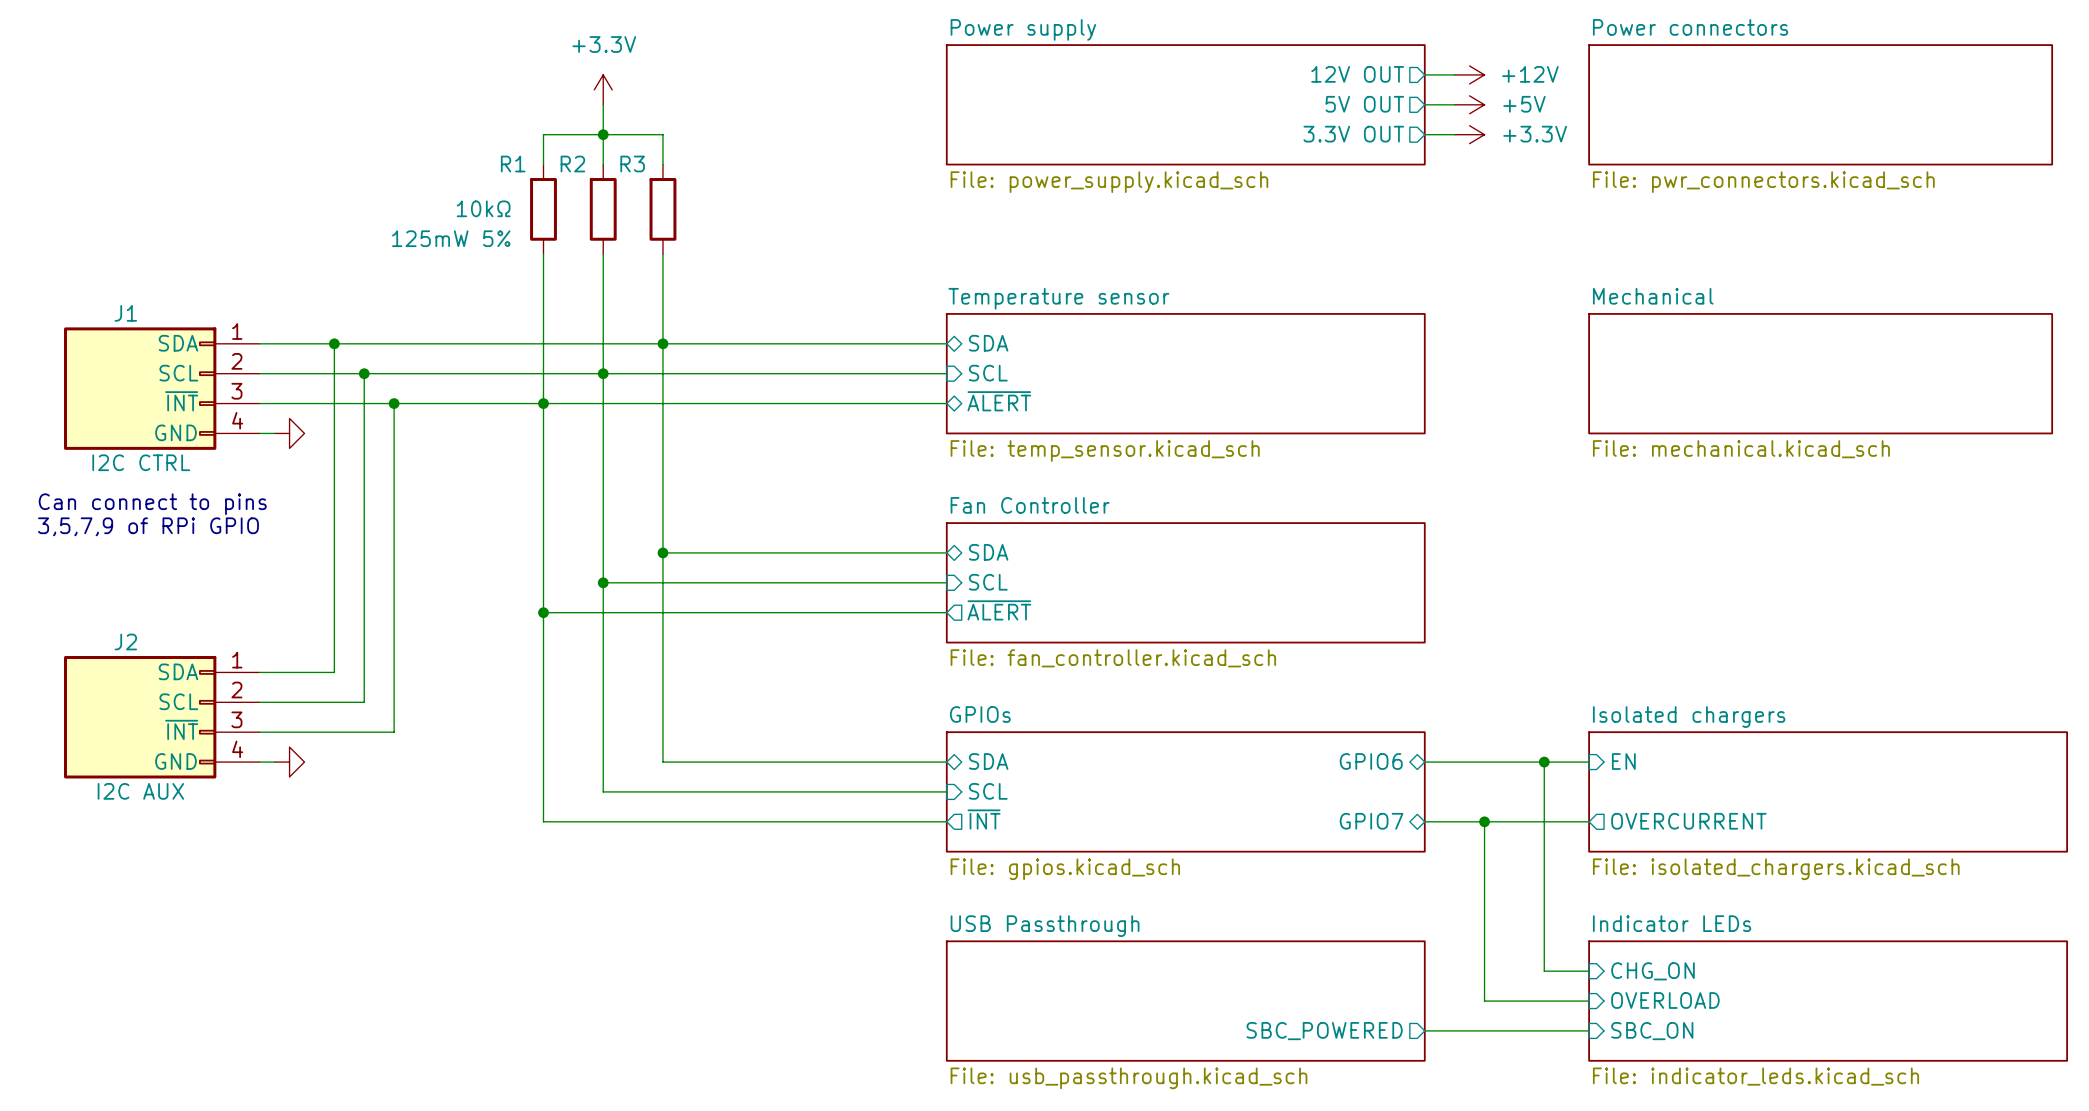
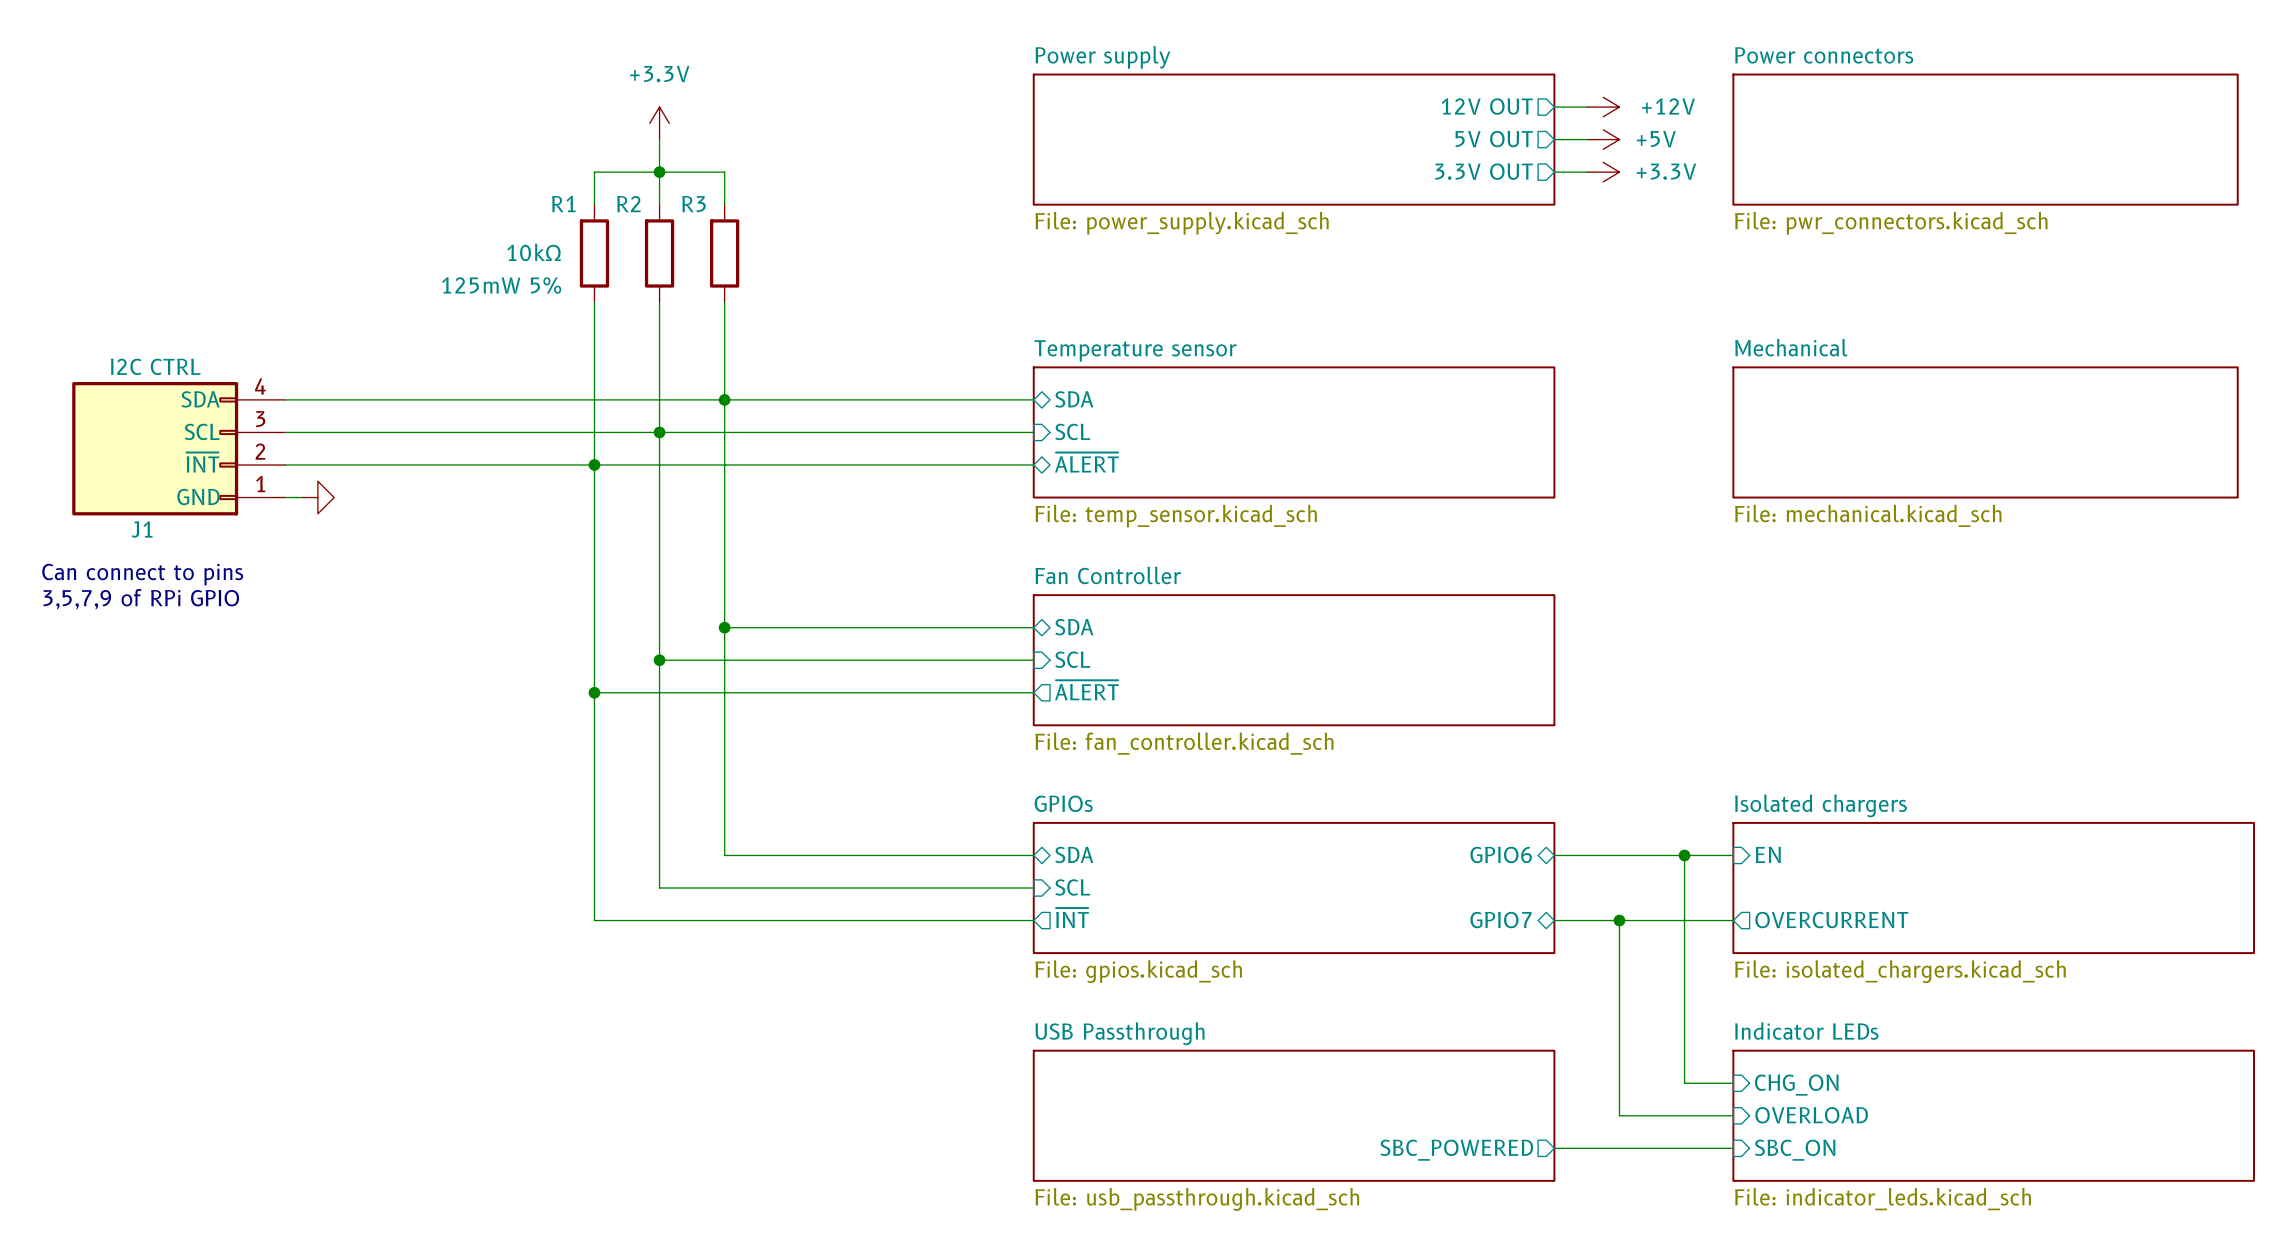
wire: (334, 343) (334, 672) (259, 672) -> none
junction: (334, 343) -> none
wire: (364, 373) (364, 702) (259, 702) -> none
junction: (364, 373) -> none
J1 flip: as is (140, 388) -> up-down (155, 448)
wire: (394, 403) (394, 732) (259, 732) -> none
junction: (394, 403) -> none
J2: (161, 717) -> none
wire: (259, 762) (274, 762) -> none
power symbol: (289, 762) -> none

